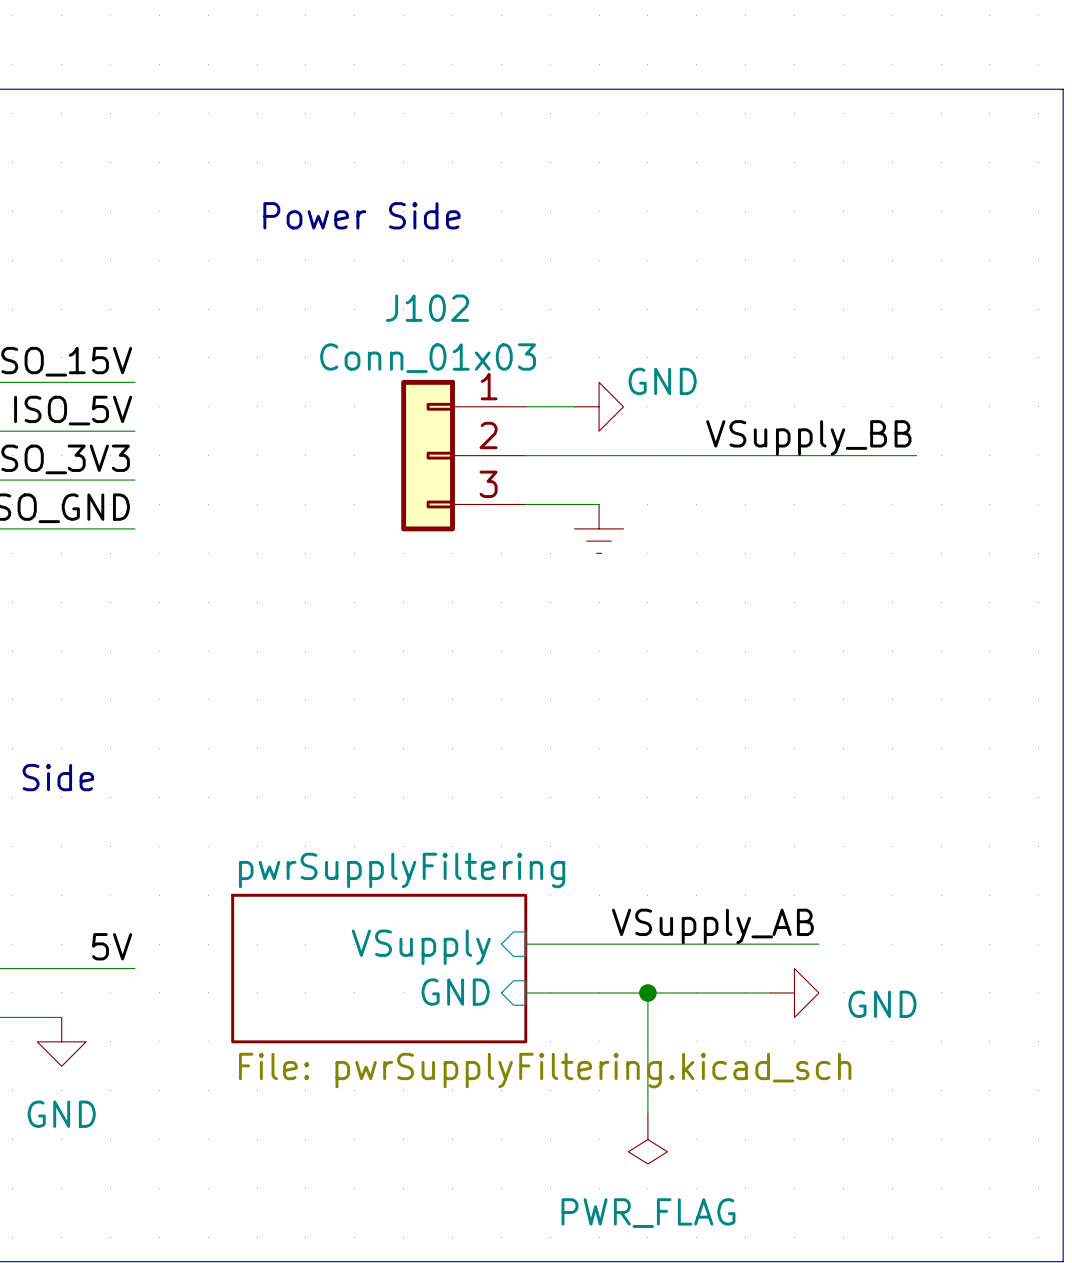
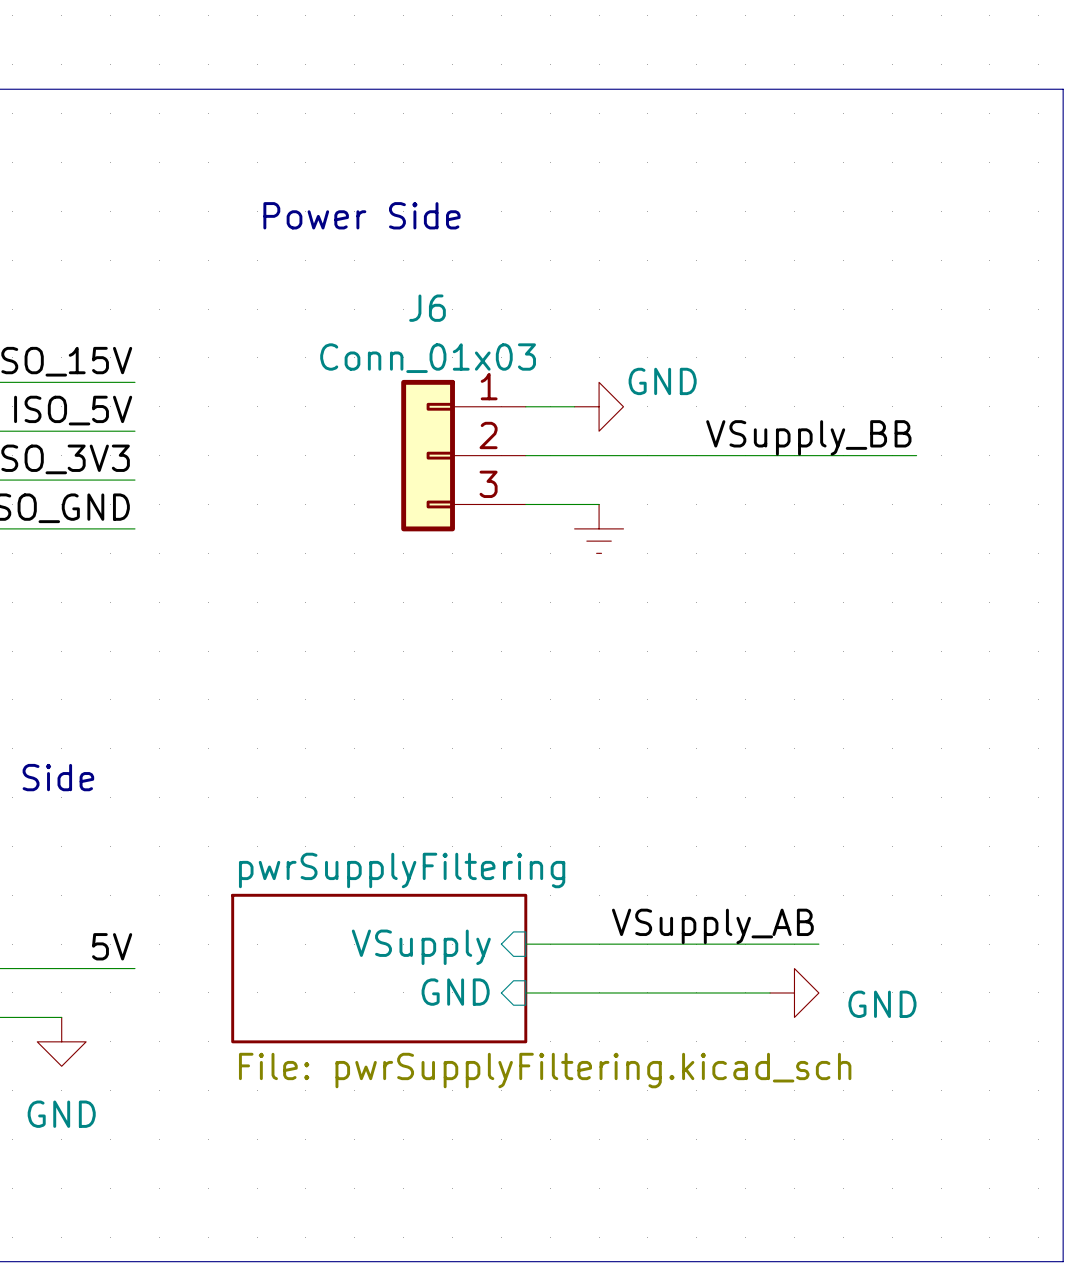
J102 name: J102 (427, 308) -> J6 (427, 308)
wire: (647, 992) (647, 1115) -> none
junction: (647, 992) -> none
power symbol: PWR_FLAG (647, 1139) -> none

